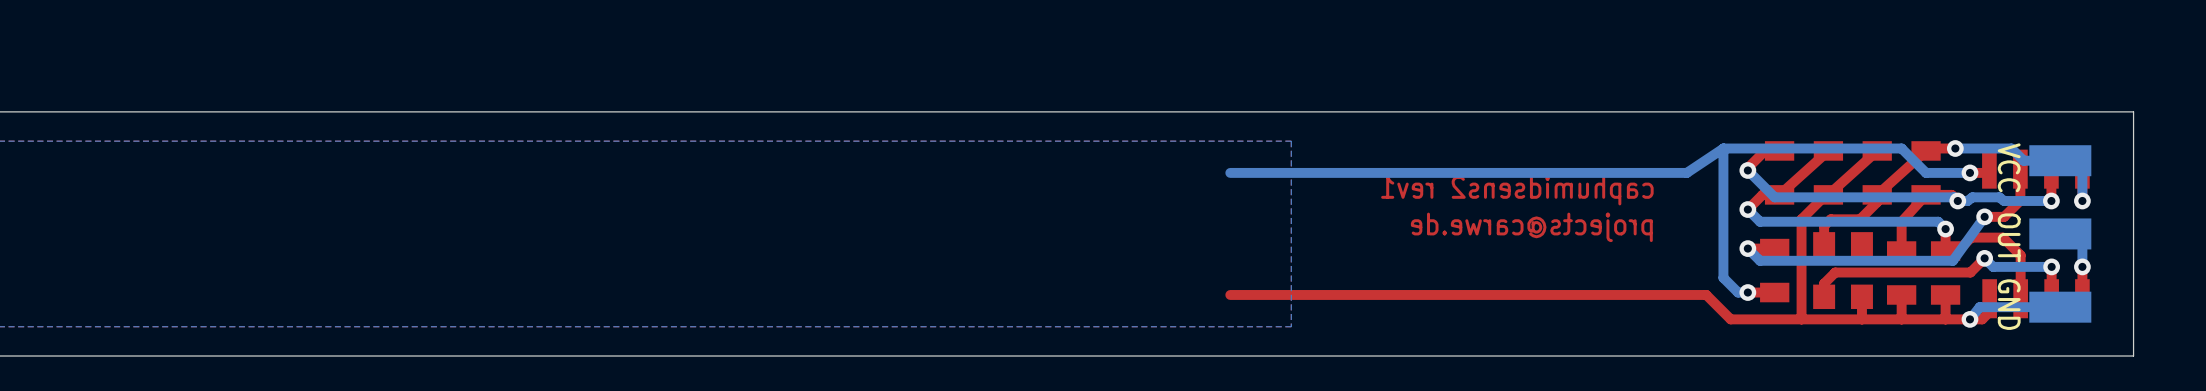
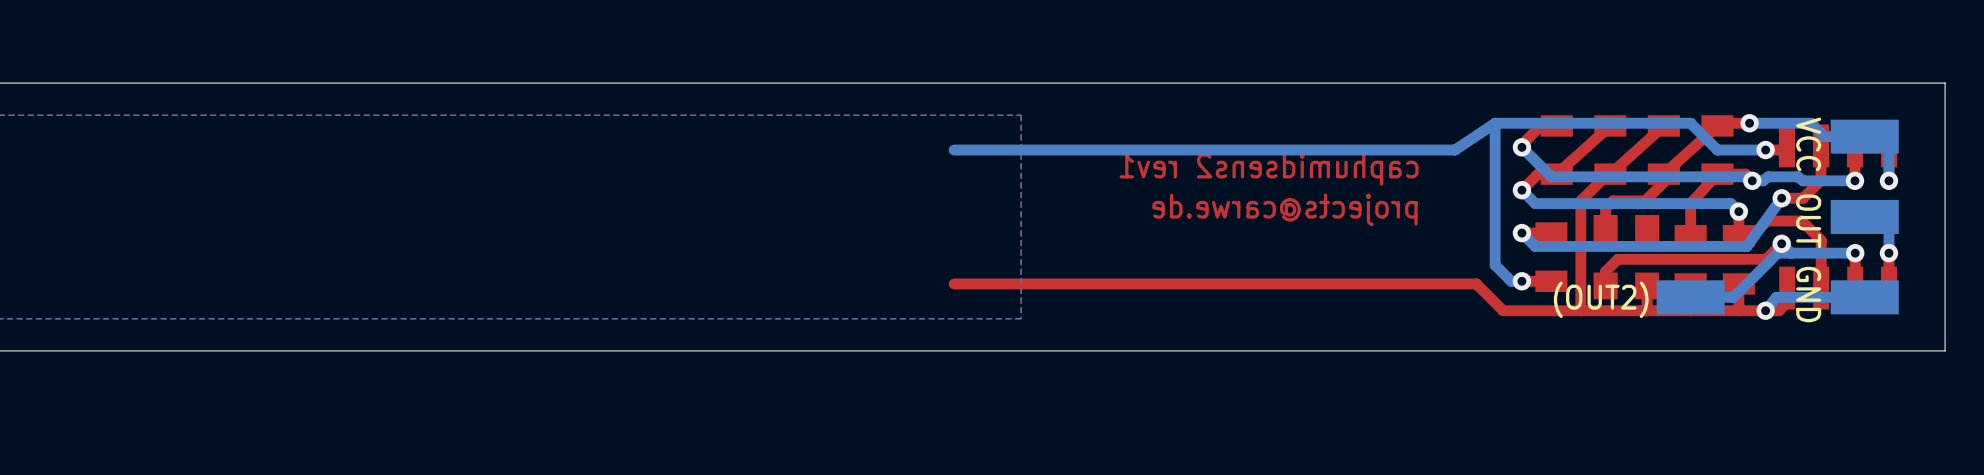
bottom track: none -> (1791, 253) (1777, 253) (1733, 297) (1690, 297)
(OUT2): none -> (1690, 297)

